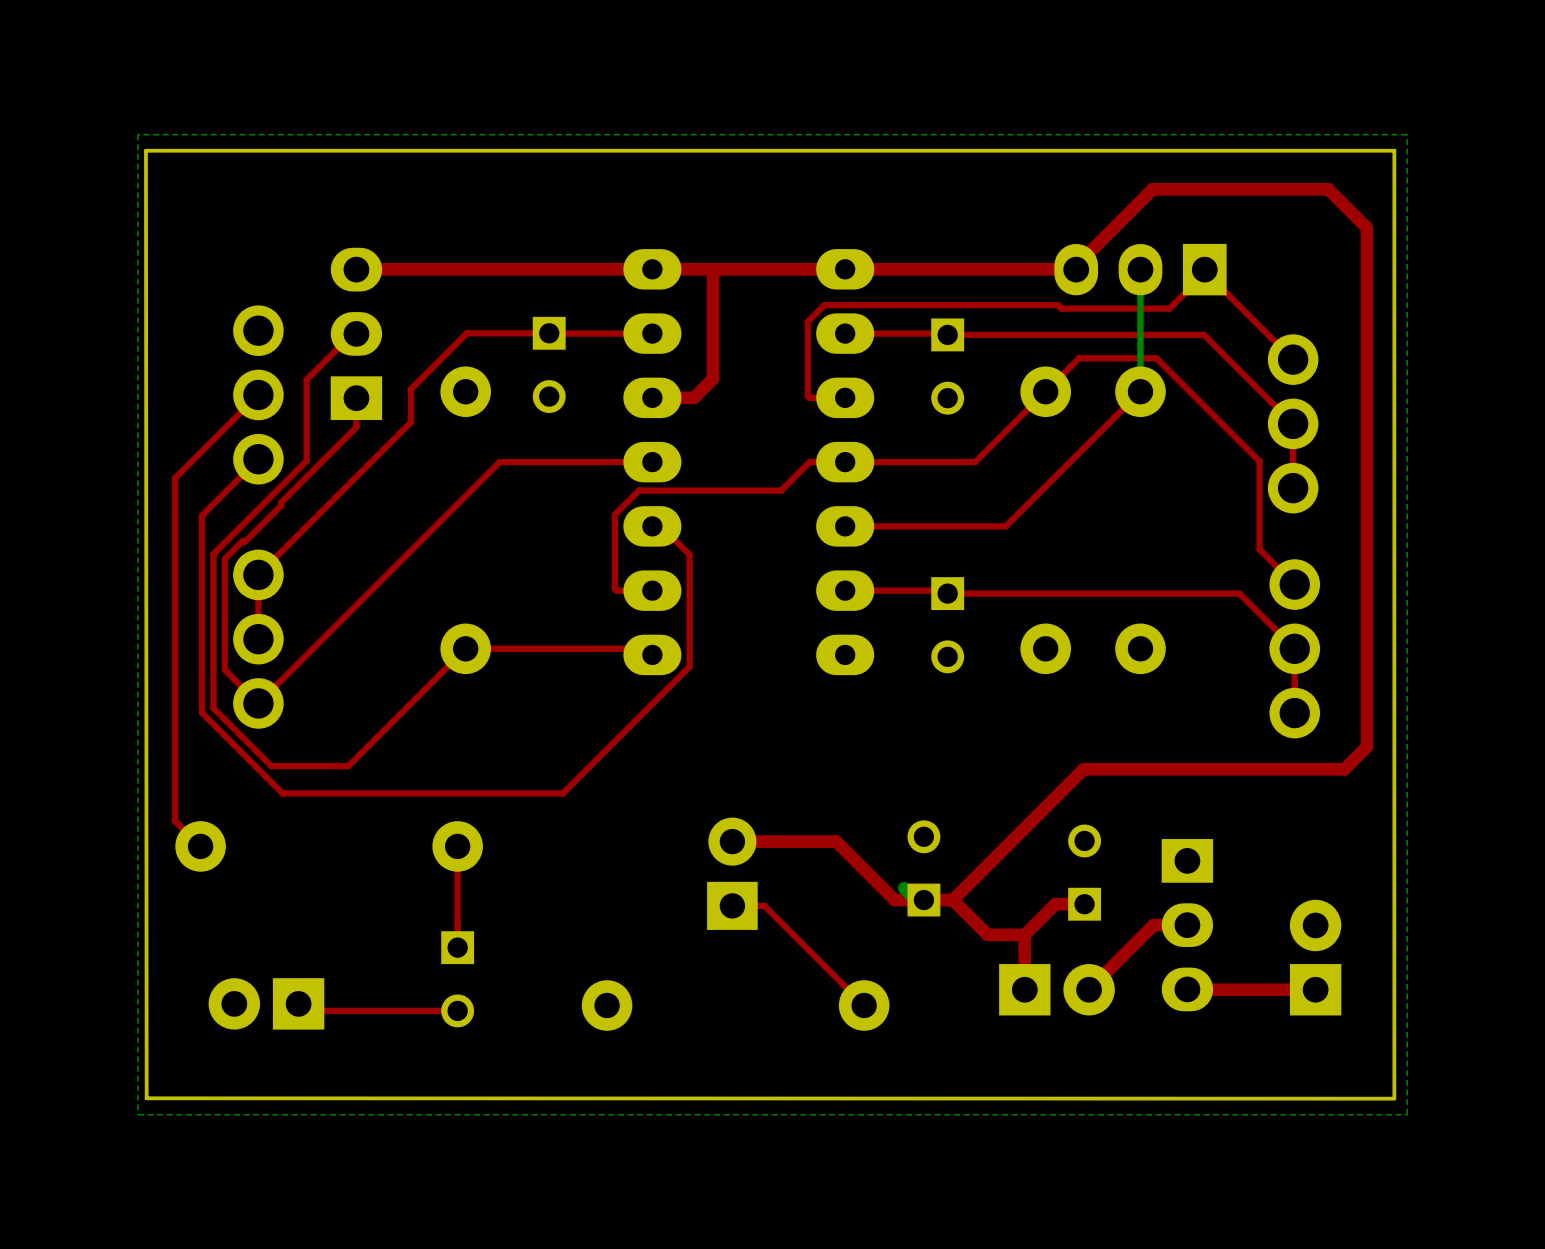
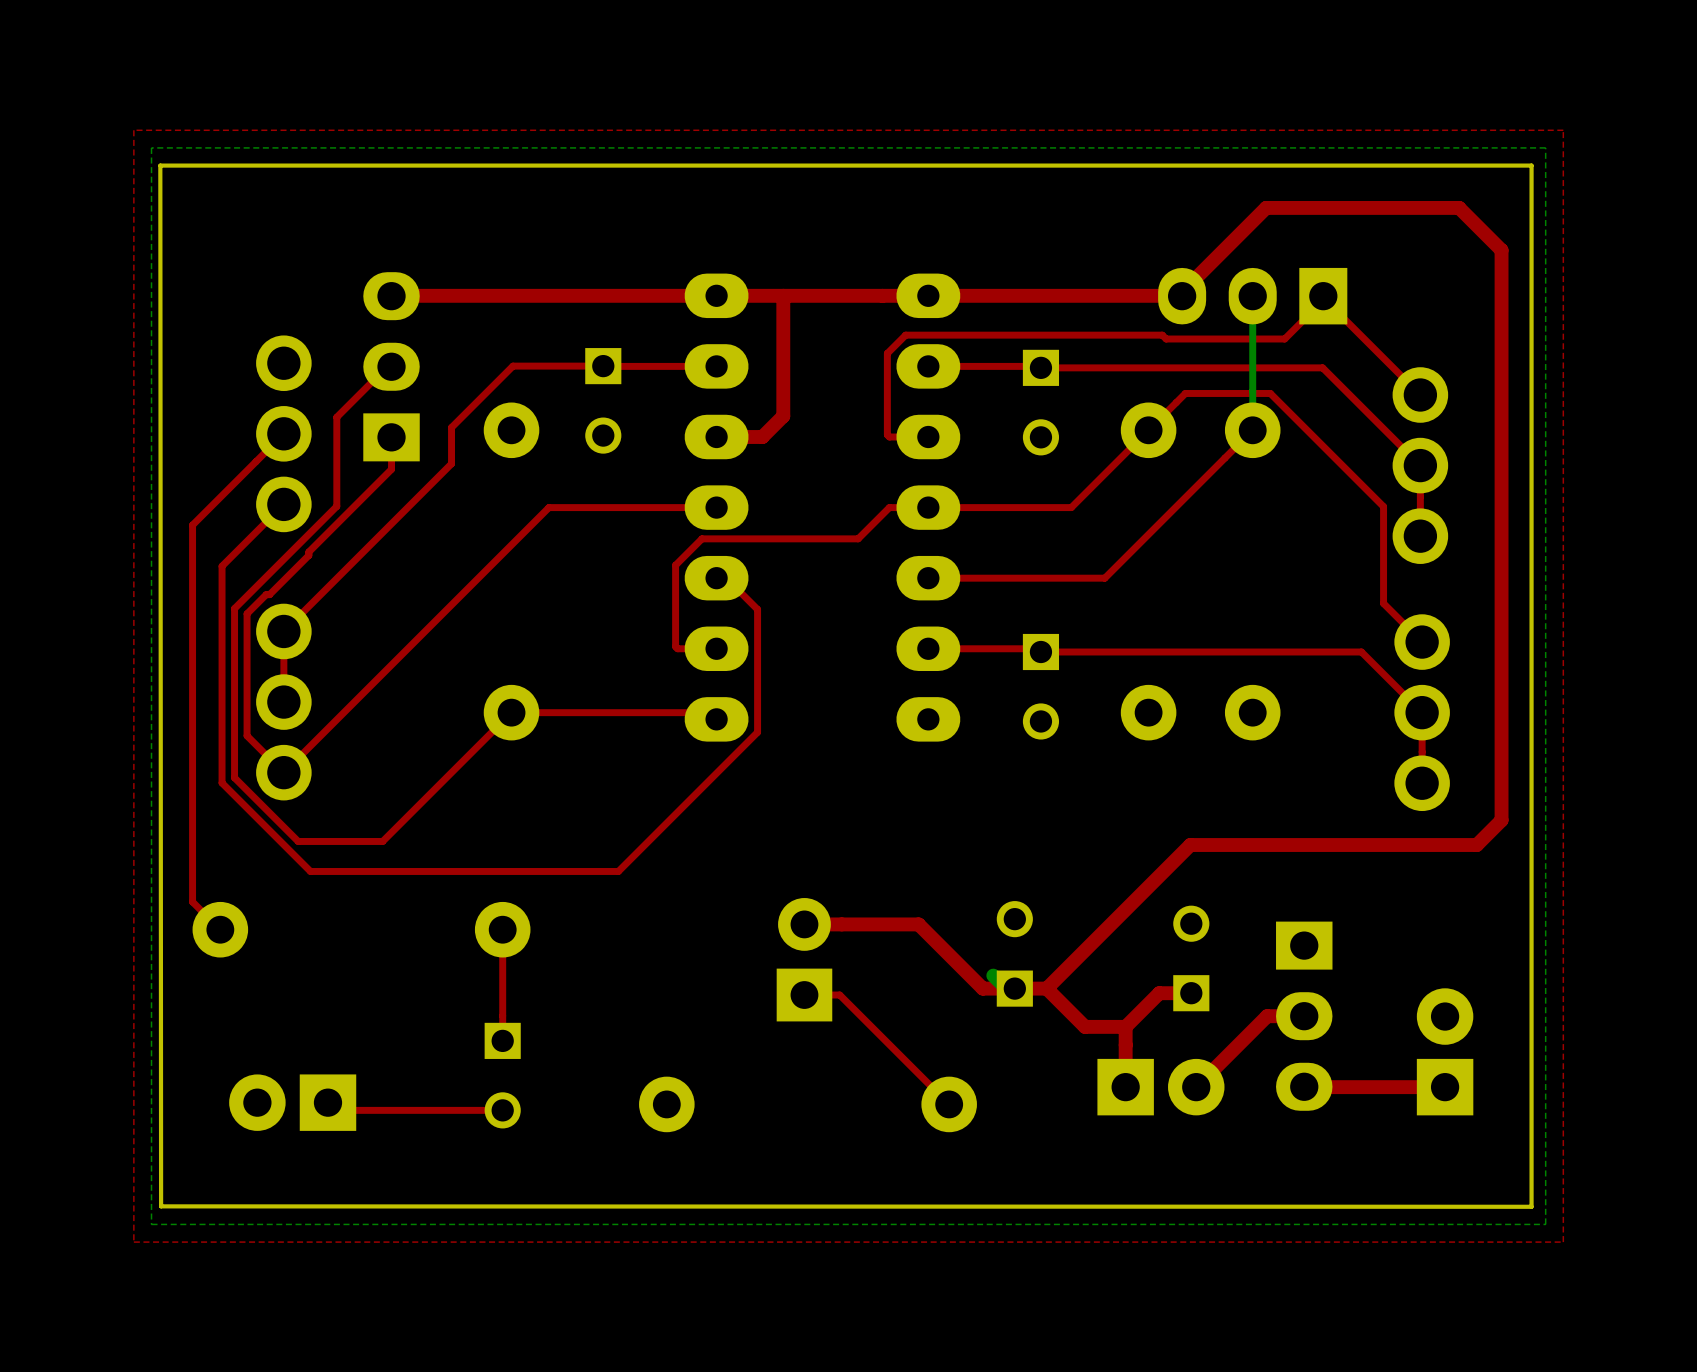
top zone outline: none -> (1563, 130) (133, 130) (133, 1242) (1563, 1242) (1563, 130)

